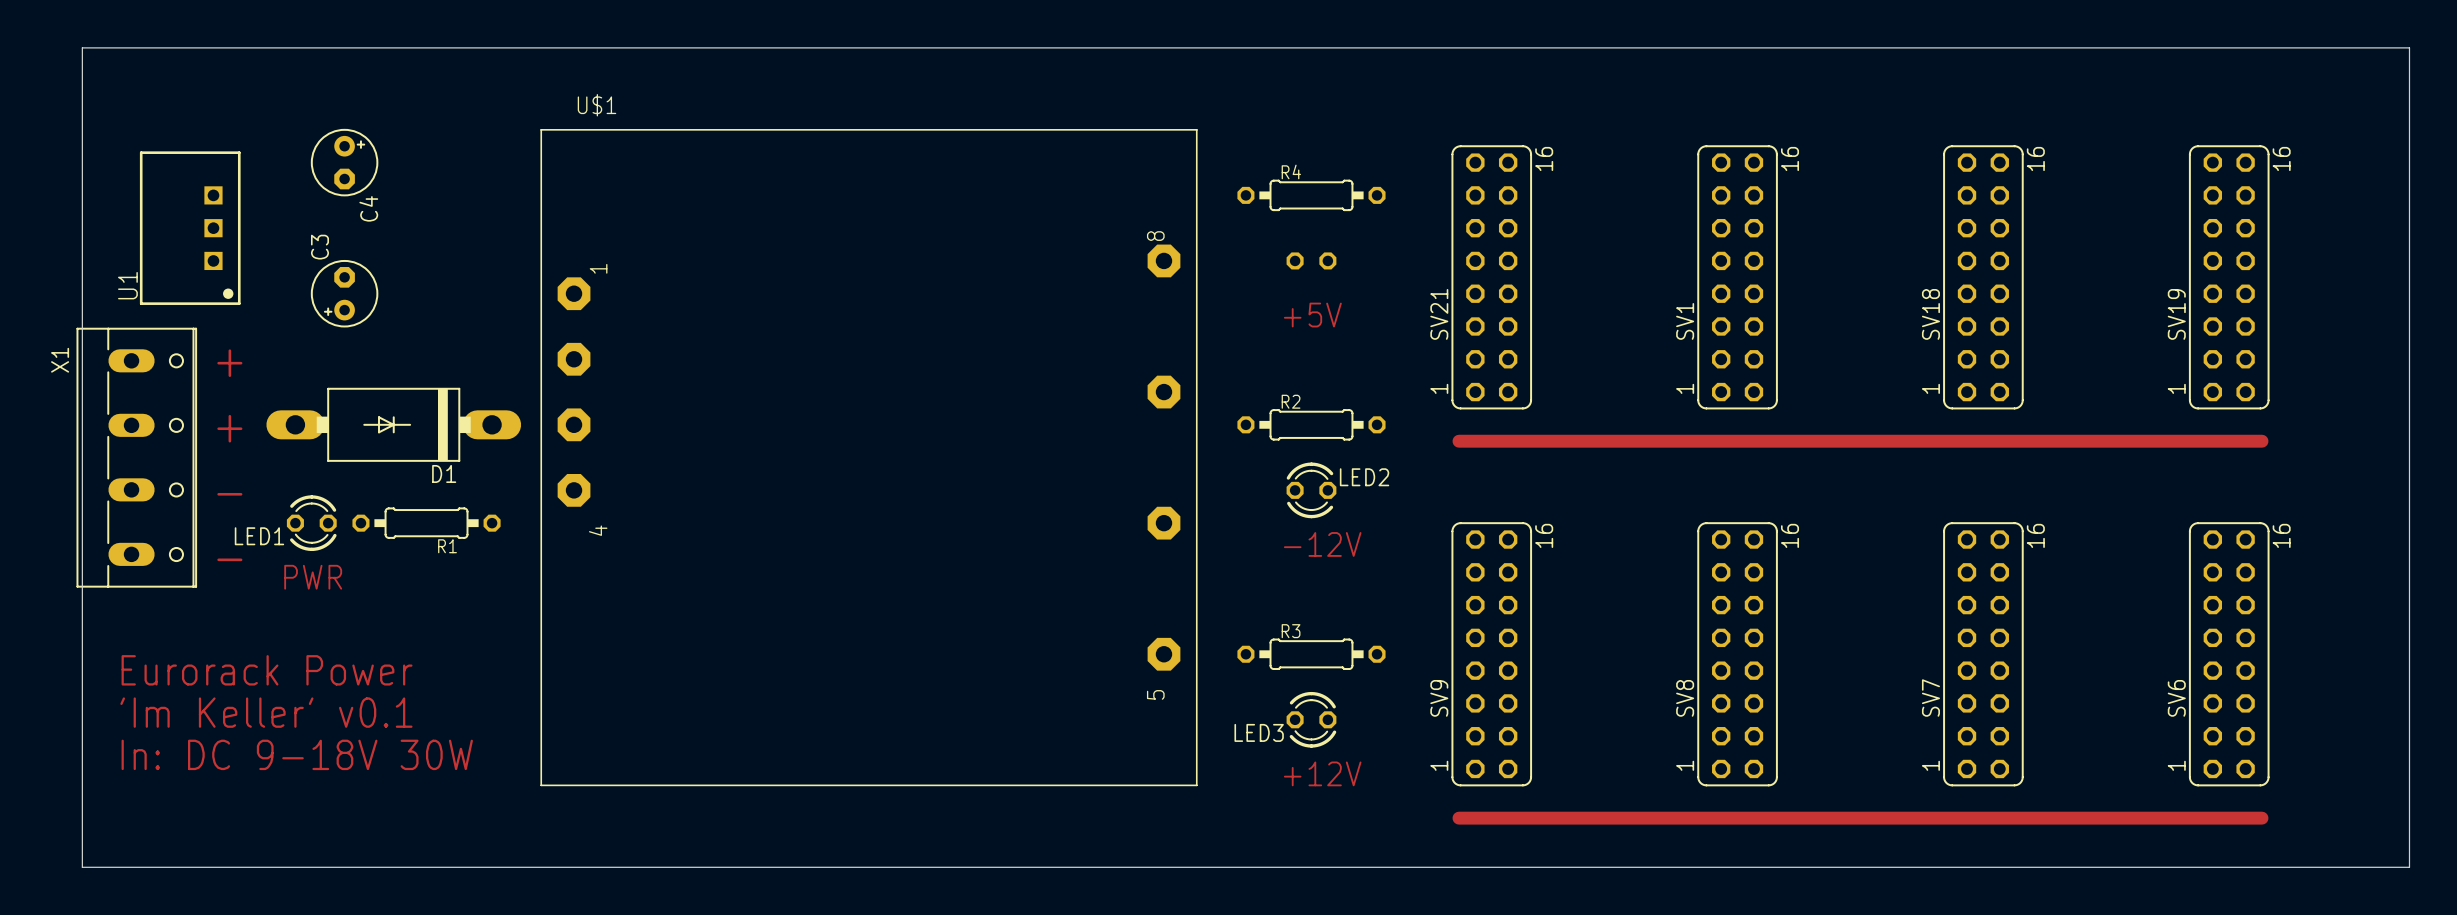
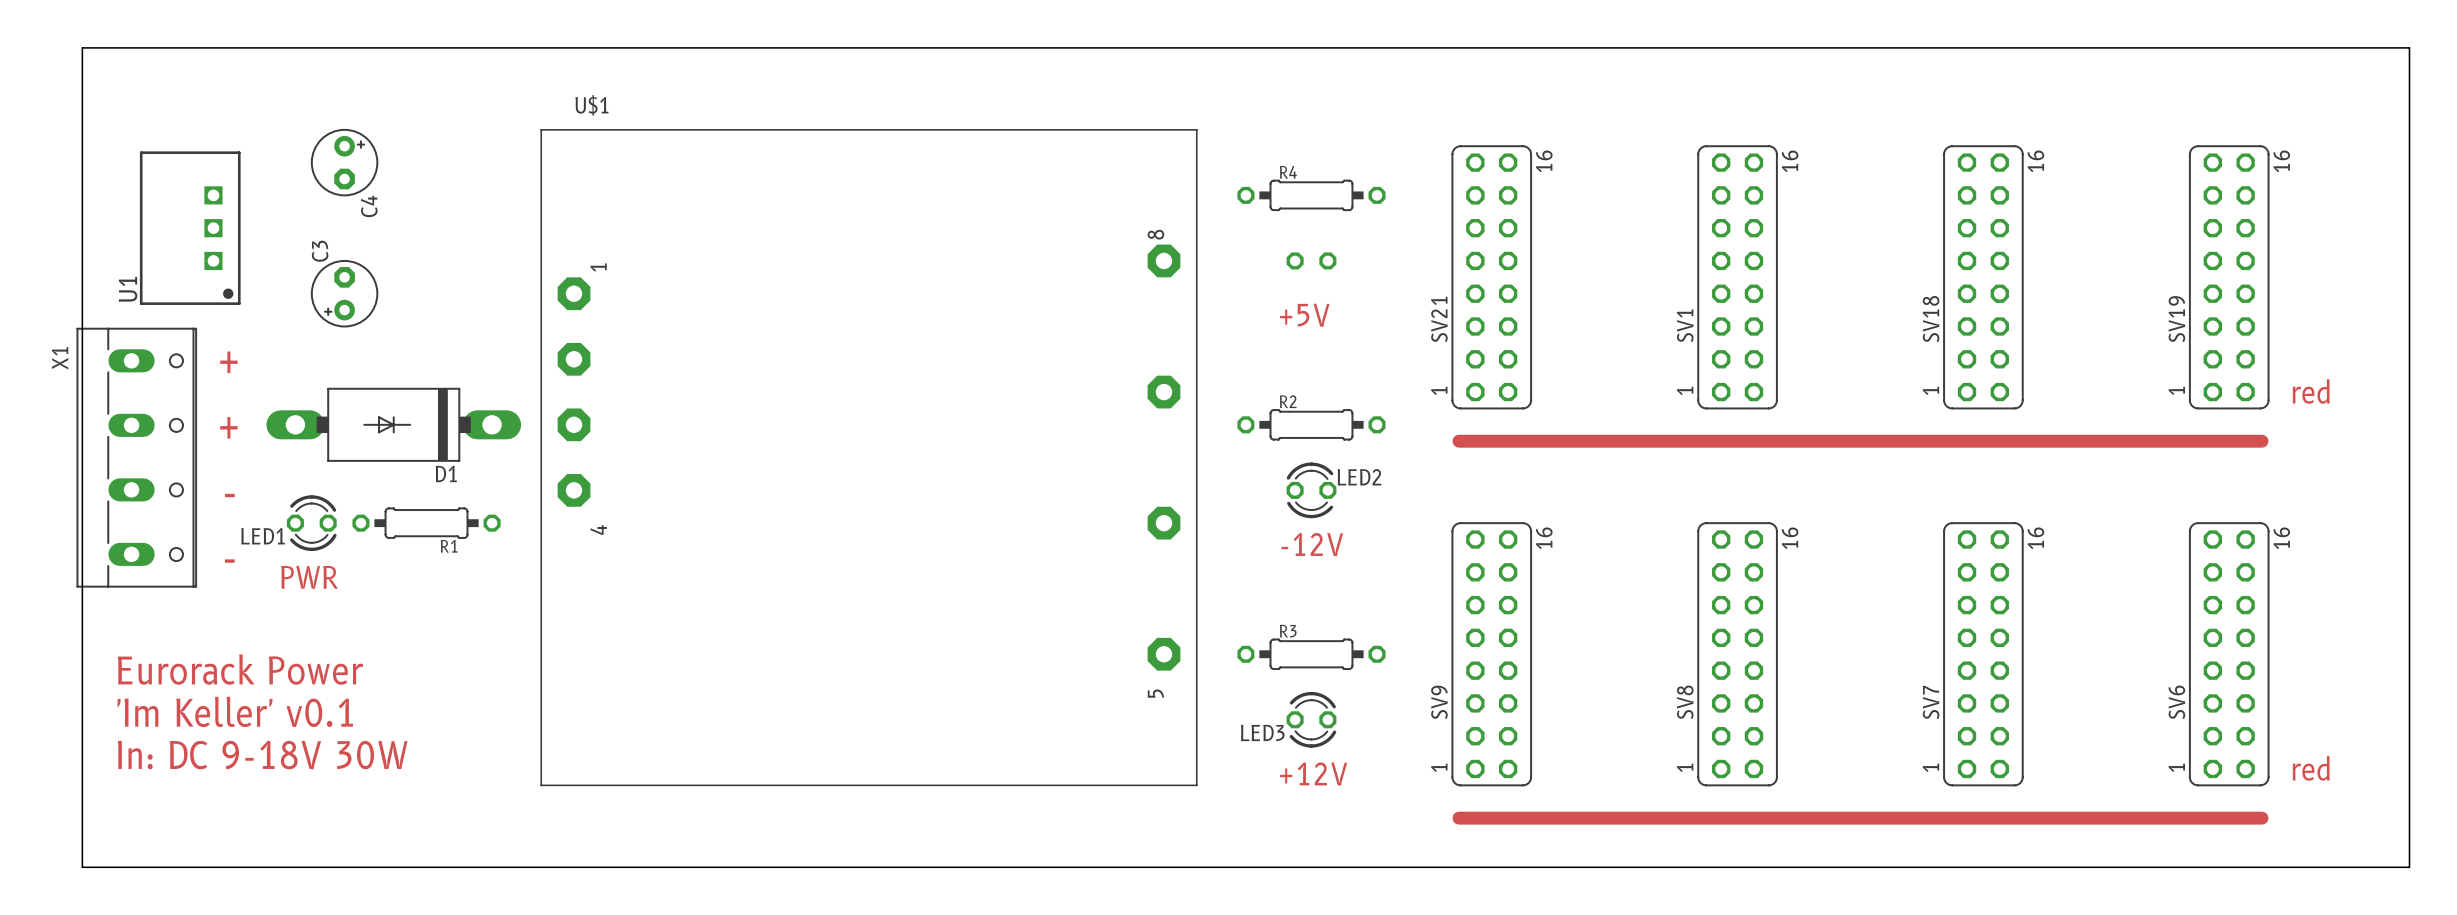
text: none -> red (2311, 391)
text: none -> red (2311, 768)

